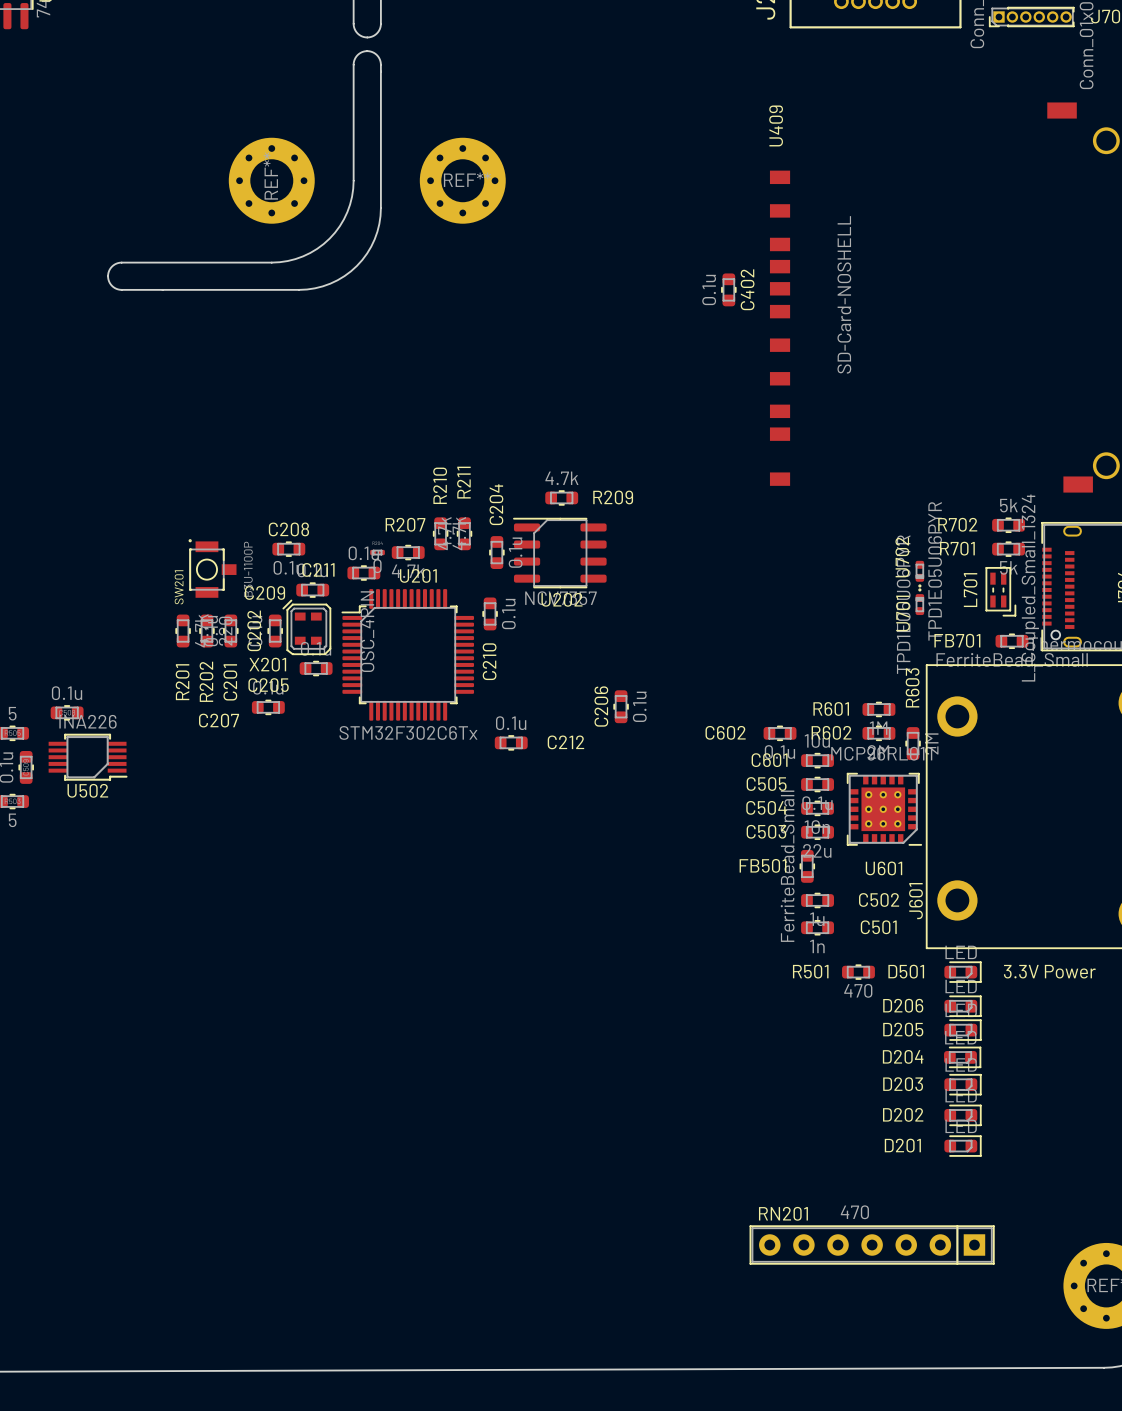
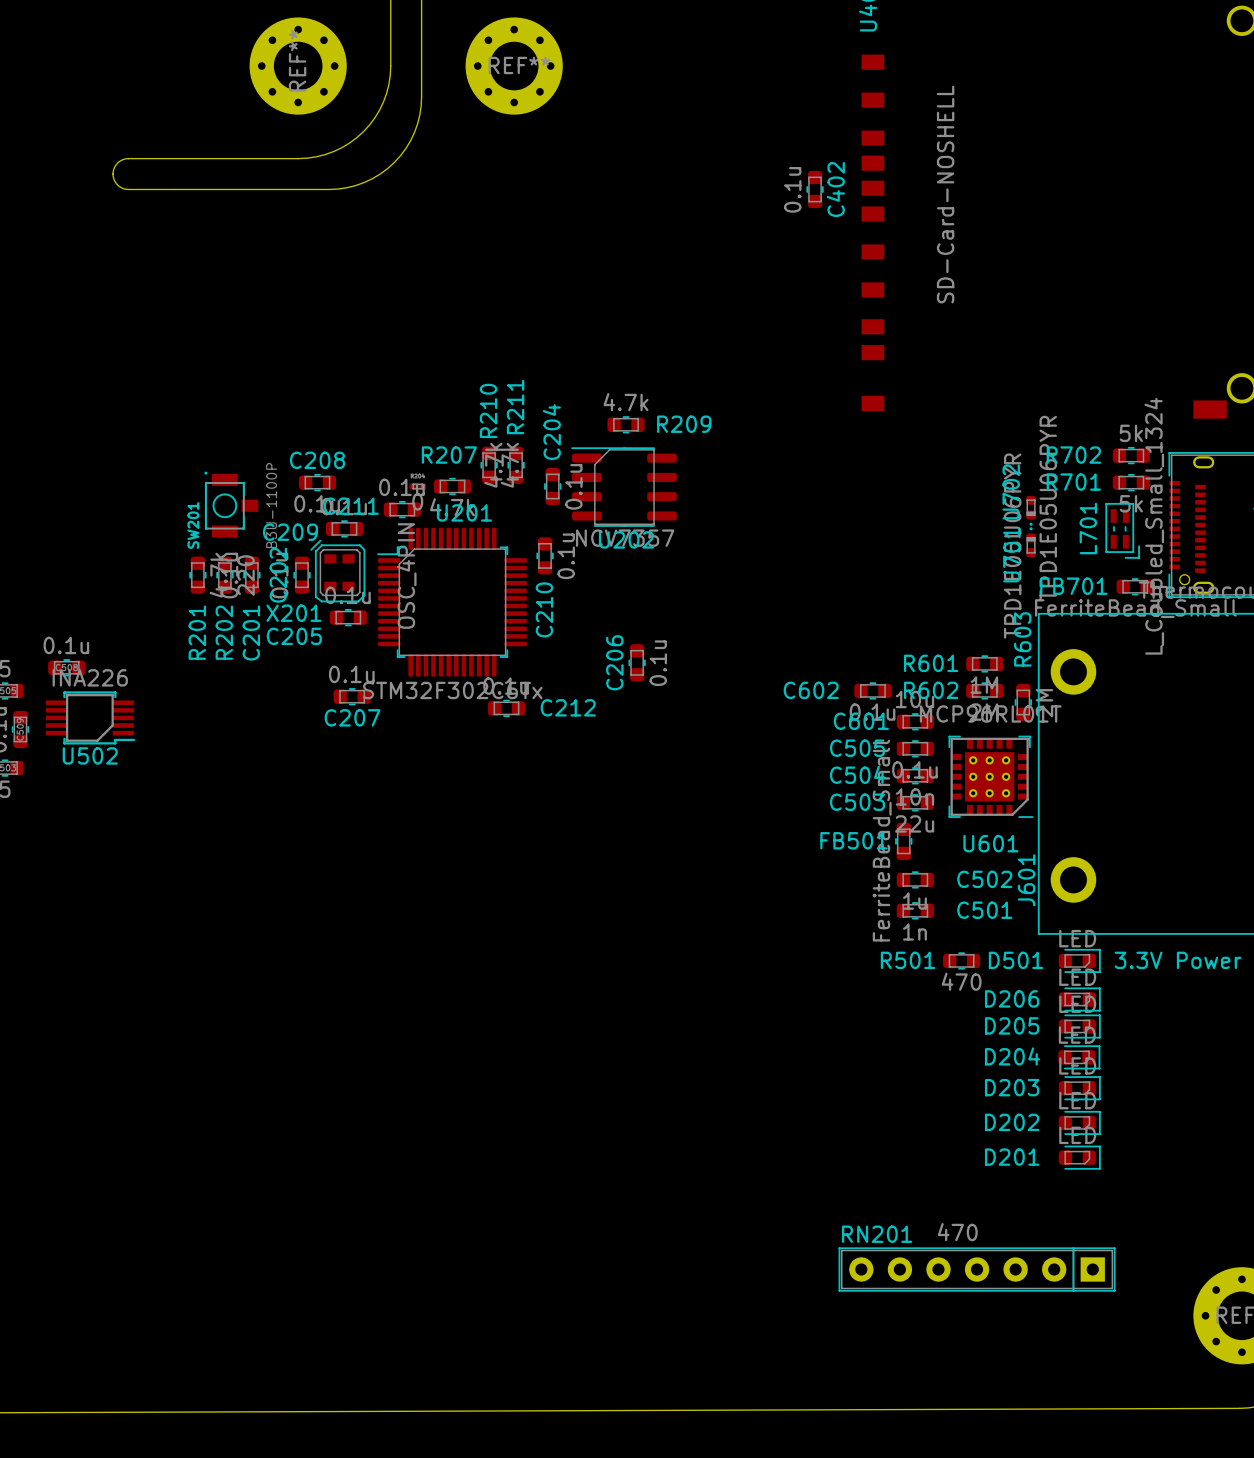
C206 position: (621, 706) -> (637, 662)
C207 position: (268, 707) -> (352, 696)
C207 name position: C207 (219, 720) -> C207 (352, 717)
C212 position: (511, 742) -> (506, 708)

